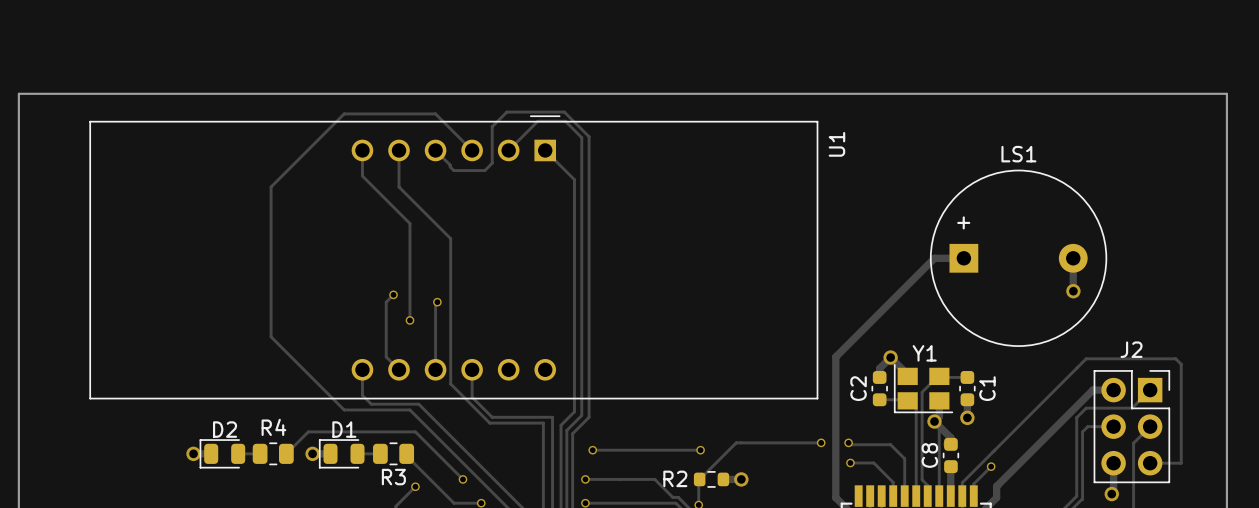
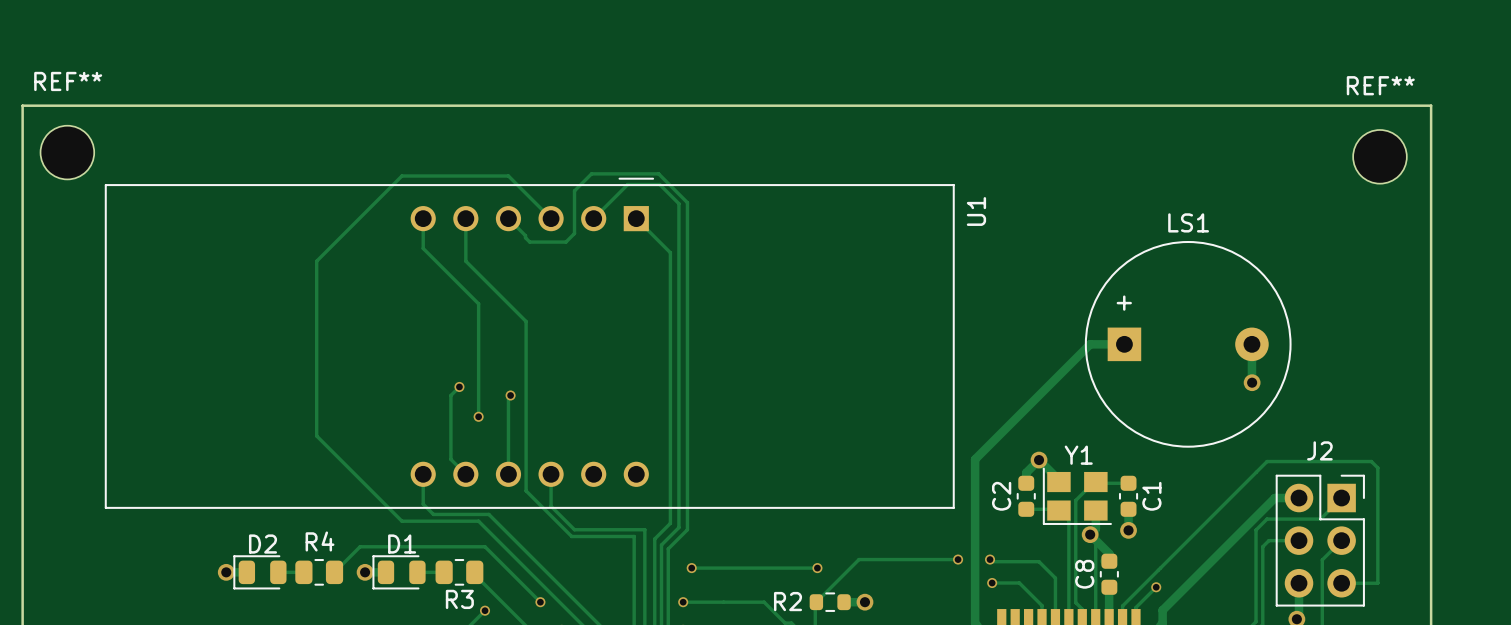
board edge: (18, 93) (1226, 93) -> (22, 152) (22, 105) (1431, 105) (1431, 152)
REF**: none -> (67, 152)
REF**: none -> (1379, 156)

